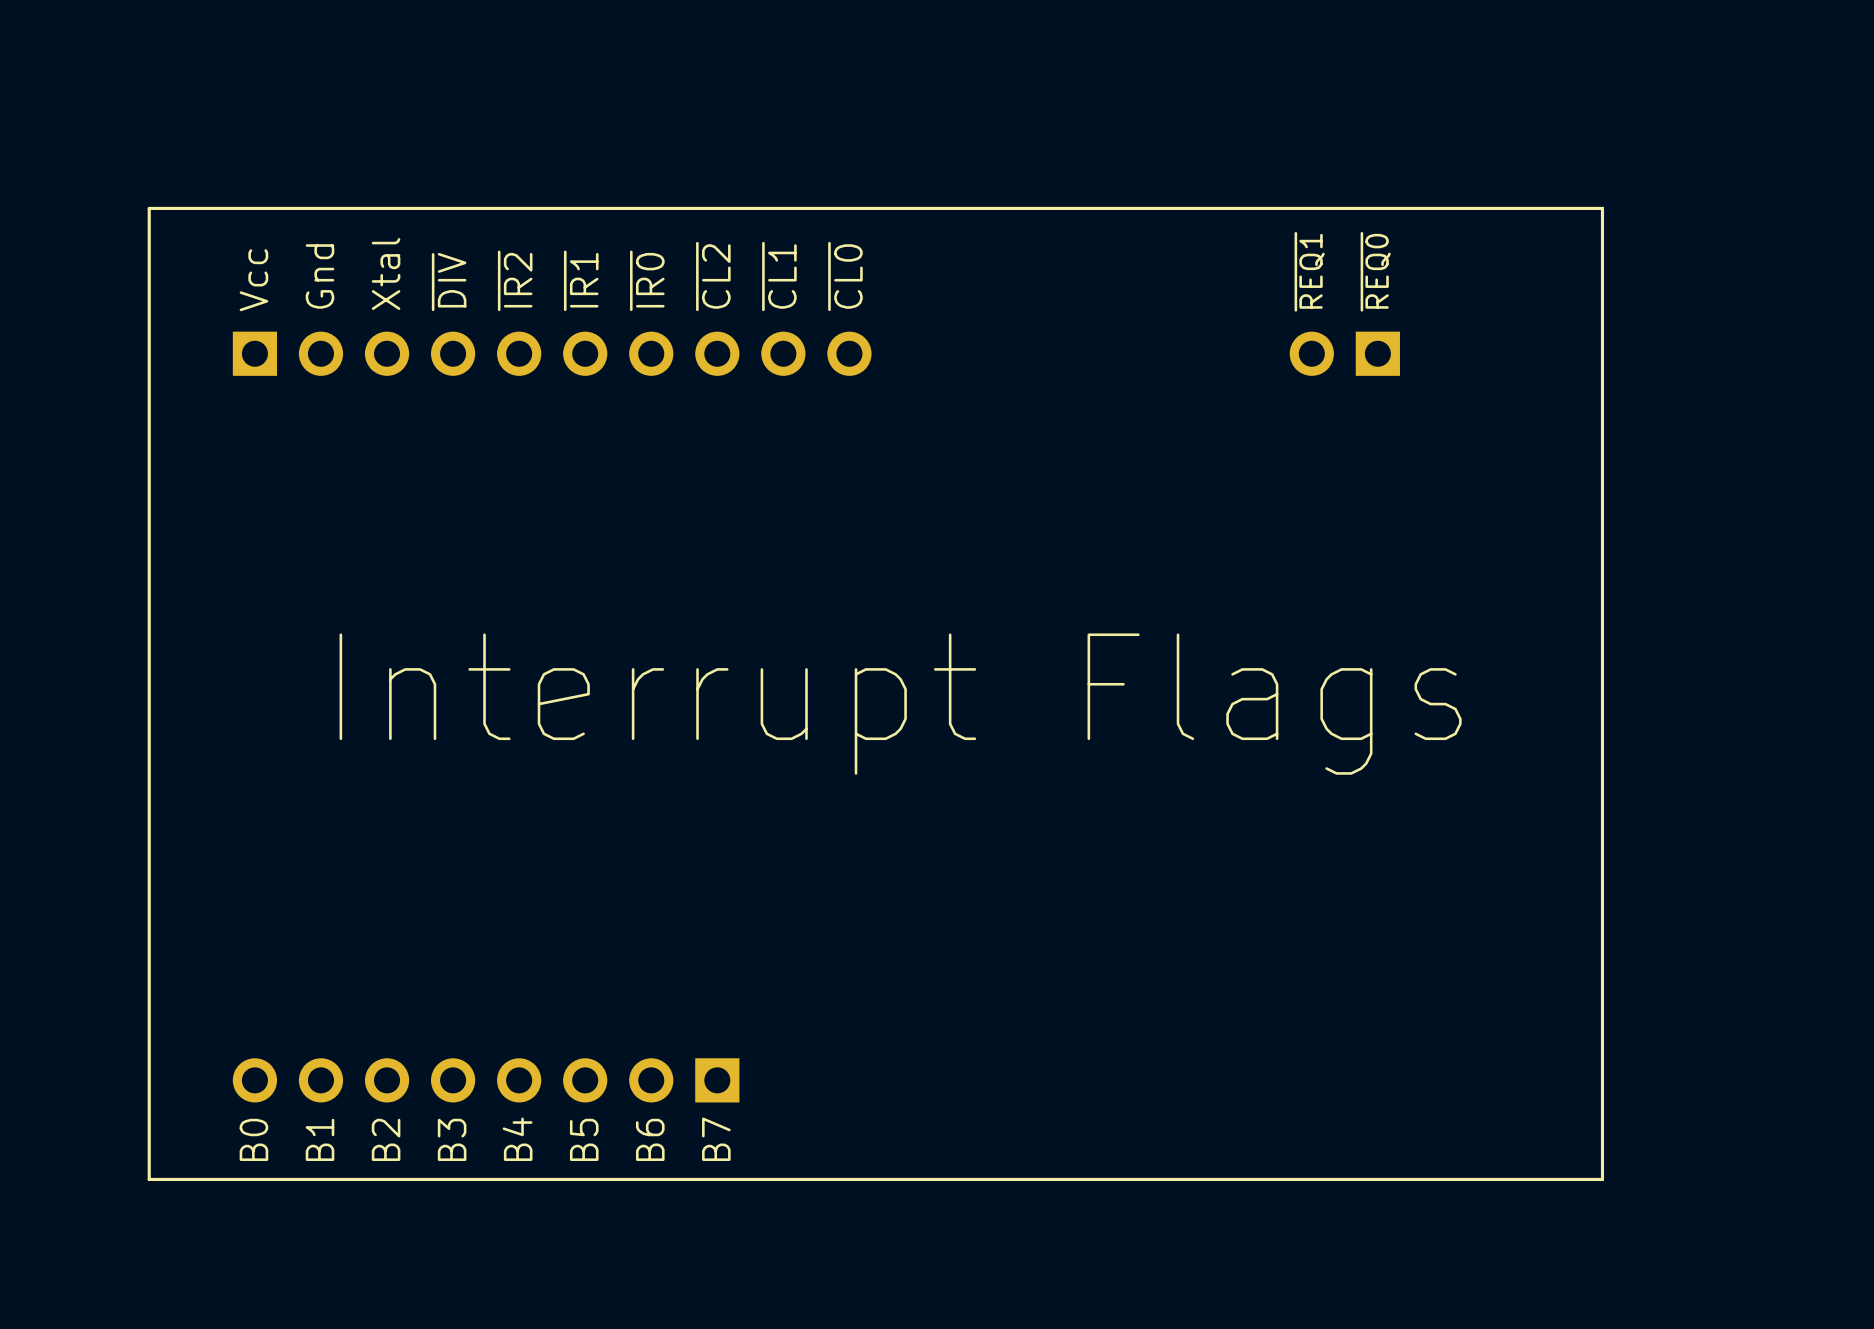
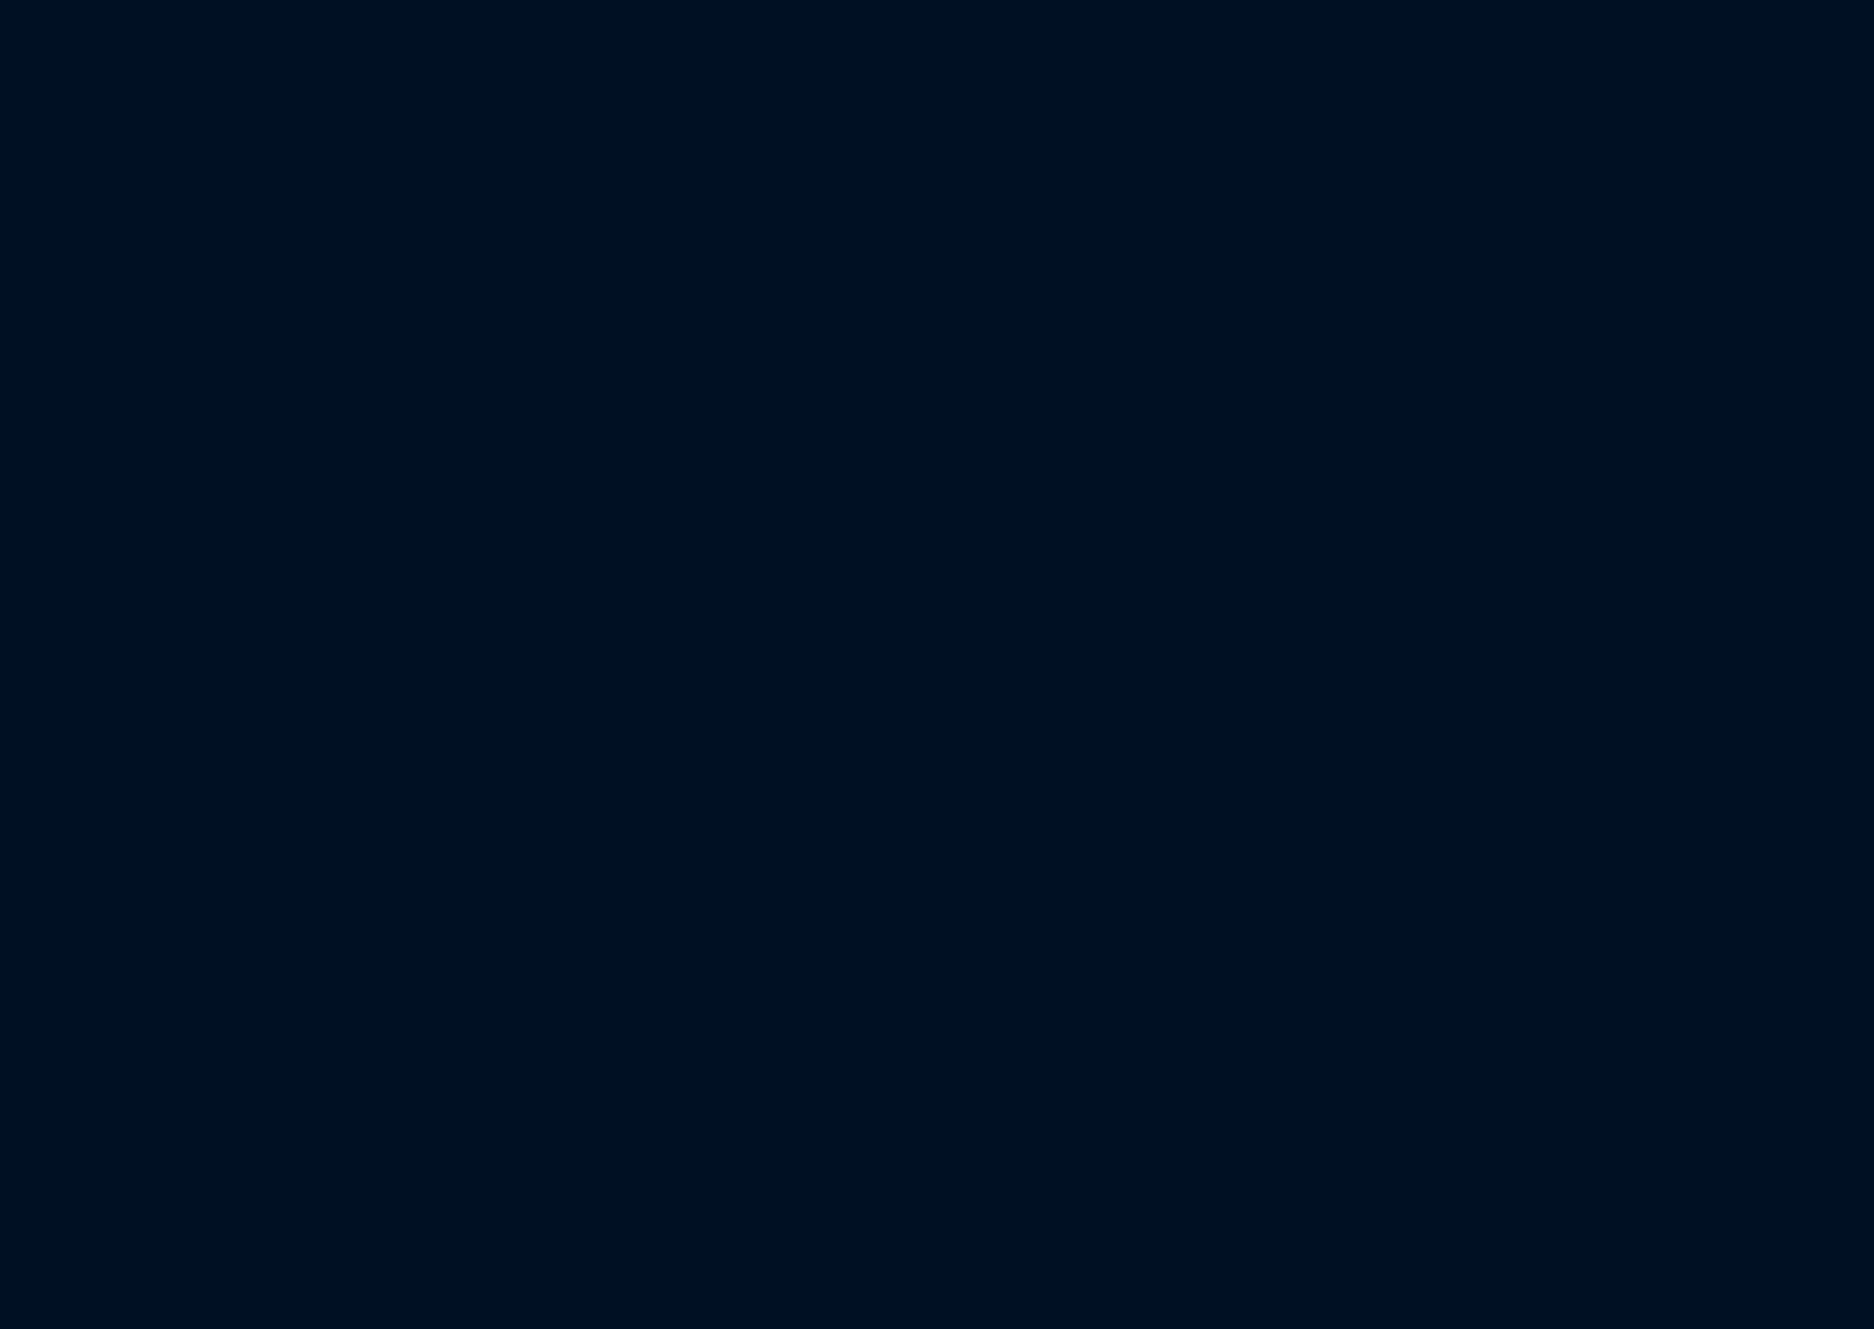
line: (149, 208) (149, 1179) (1602, 1179) (1602, 208) (149, 208) -> none
text: ~{REQ1} (1309, 271) -> none
text: ~{REQ0} (1375, 271) -> none
text: Xtal (386, 274) -> none
text: Gnd (320, 276) -> none
text: ~{CL2} (713, 276) -> none
text: ~{CL1} (779, 276) -> none
text: ~{CL0} (845, 276) -> none
text: Vcc (253, 280) -> none
text: ~{IR2} (515, 280) -> none
text: ~{IR1} (581, 280) -> none
text: ~{IR0} (647, 280) -> none
text: ~{DIV} (449, 282) -> none
part: (552, 353) -> none
part: (1344, 353) -> none
text: Interrupt Flags (900, 704) -> none
part: (486, 1080) -> none
text: B0 (253, 1139) -> none
text: B1 (320, 1139) -> none
text: B2 (386, 1139) -> none
text: B3 (452, 1139) -> none
text: B4 (517, 1139) -> none
text: B5 (584, 1139) -> none
text: B6 (650, 1139) -> none
text: B7 (716, 1139) -> none

